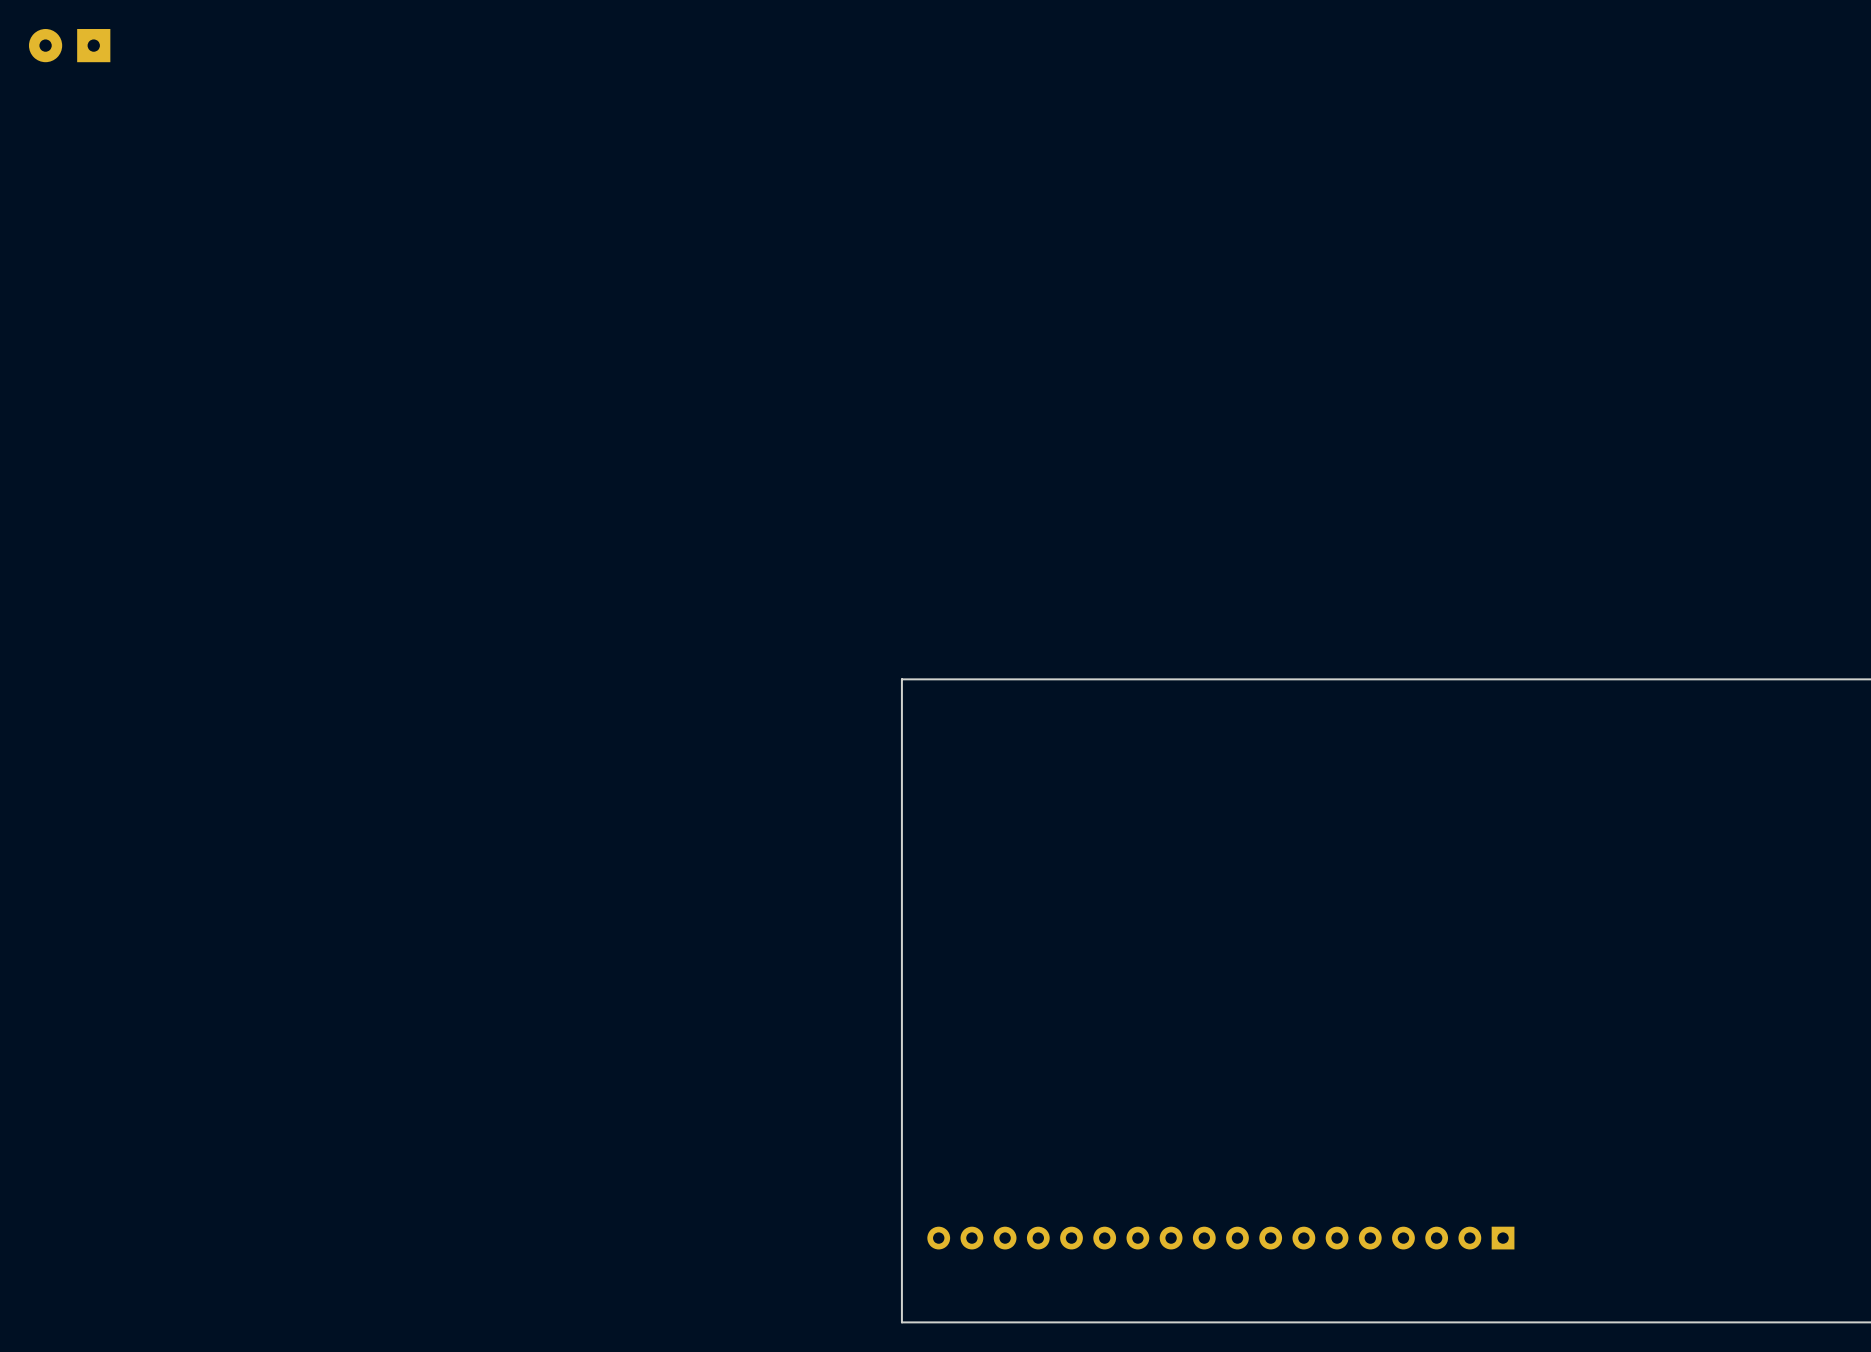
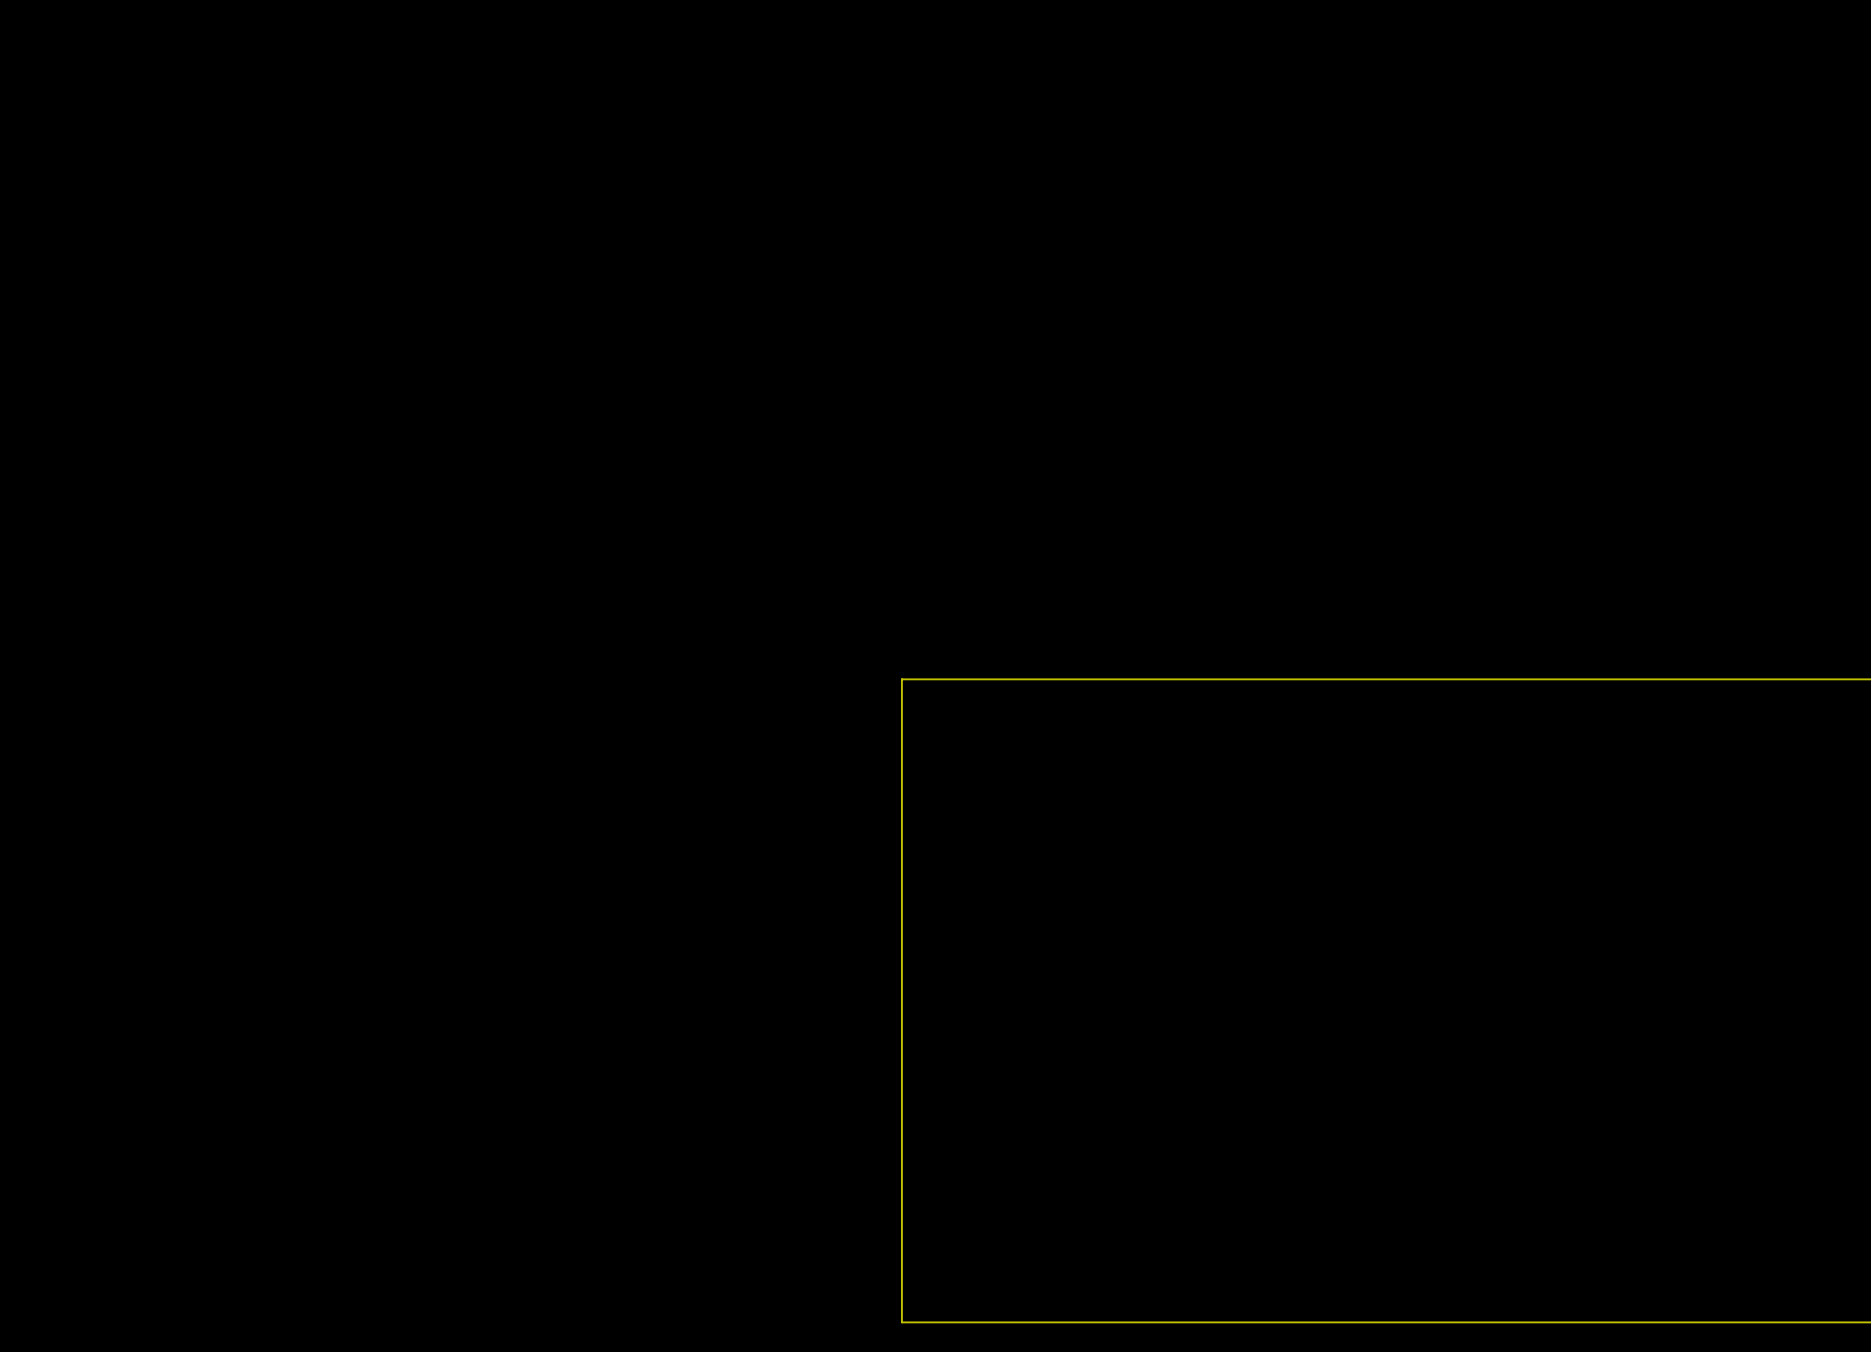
part: (69, 45) -> none
part: (971, 1238) -> none
part: (1071, 1238) -> none
part: (1171, 1238) -> none
part: (1270, 1238) -> none
part: (1370, 1238) -> none
part: (1469, 1238) -> none

